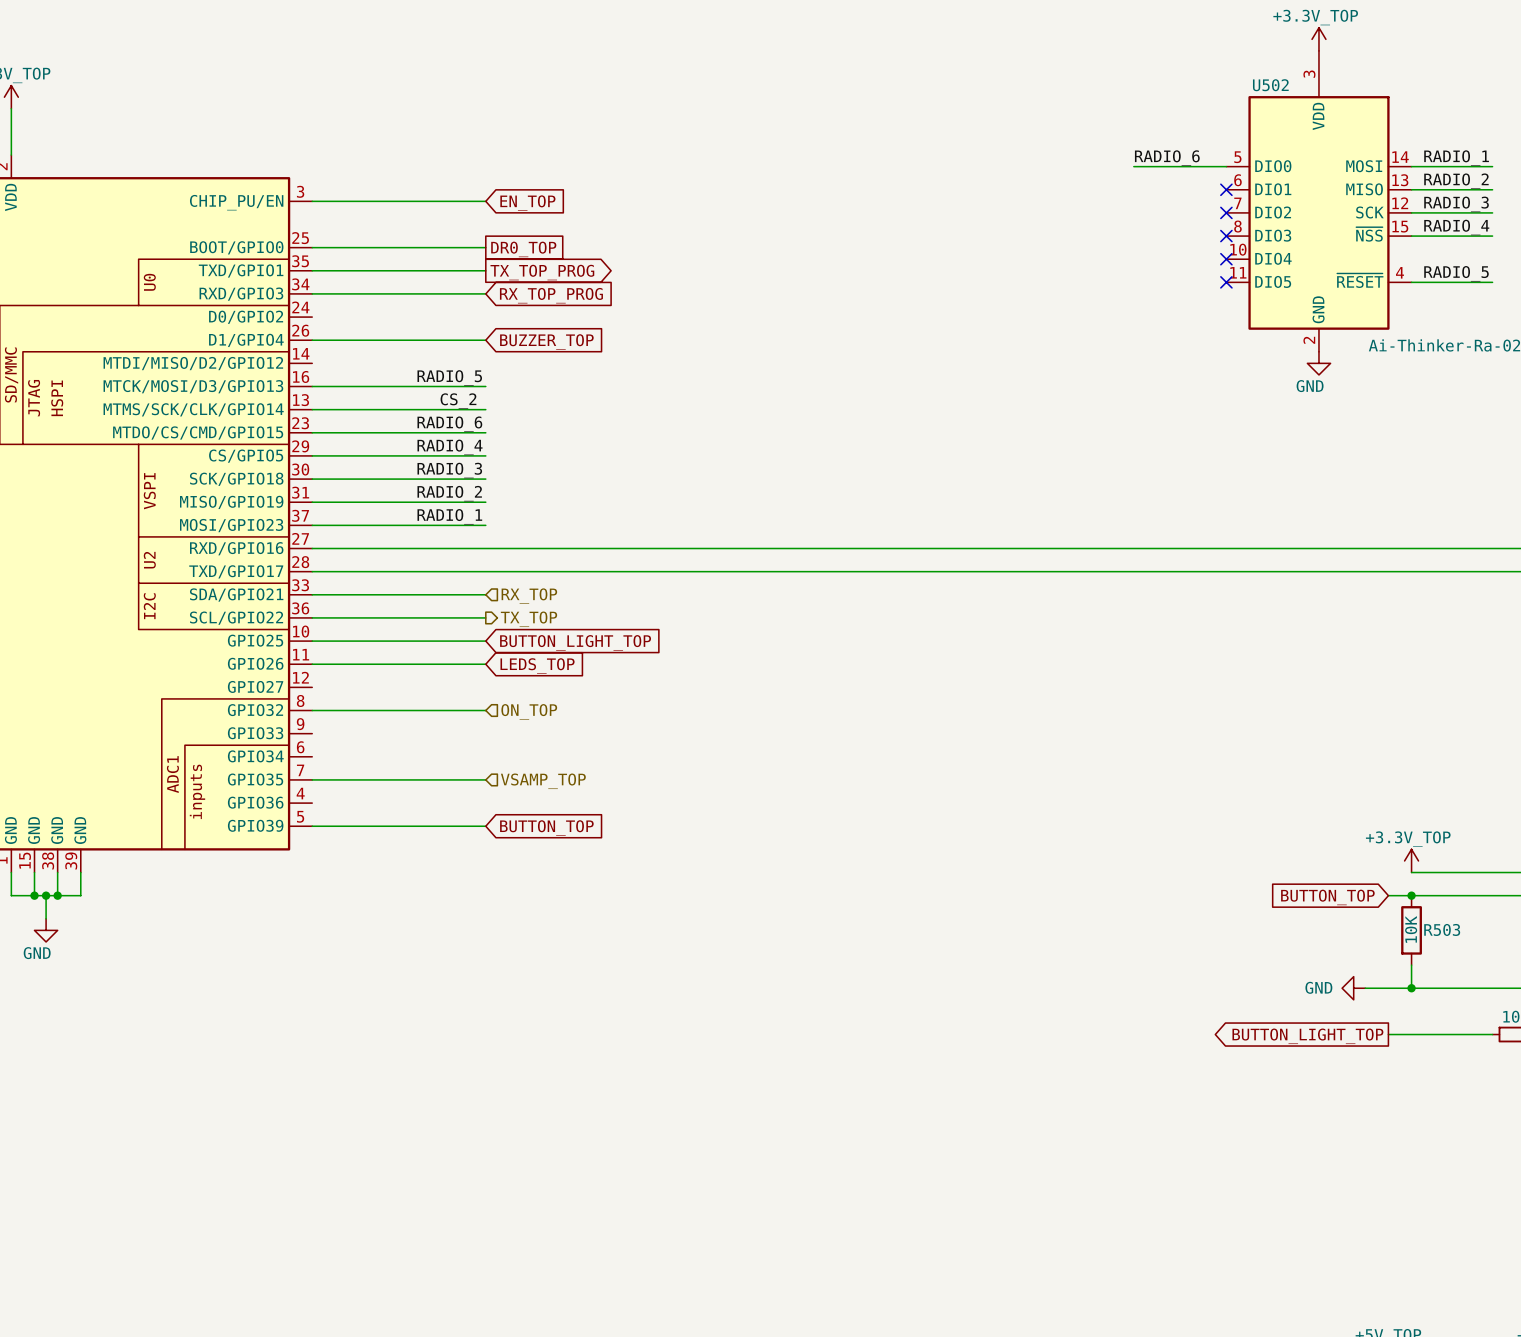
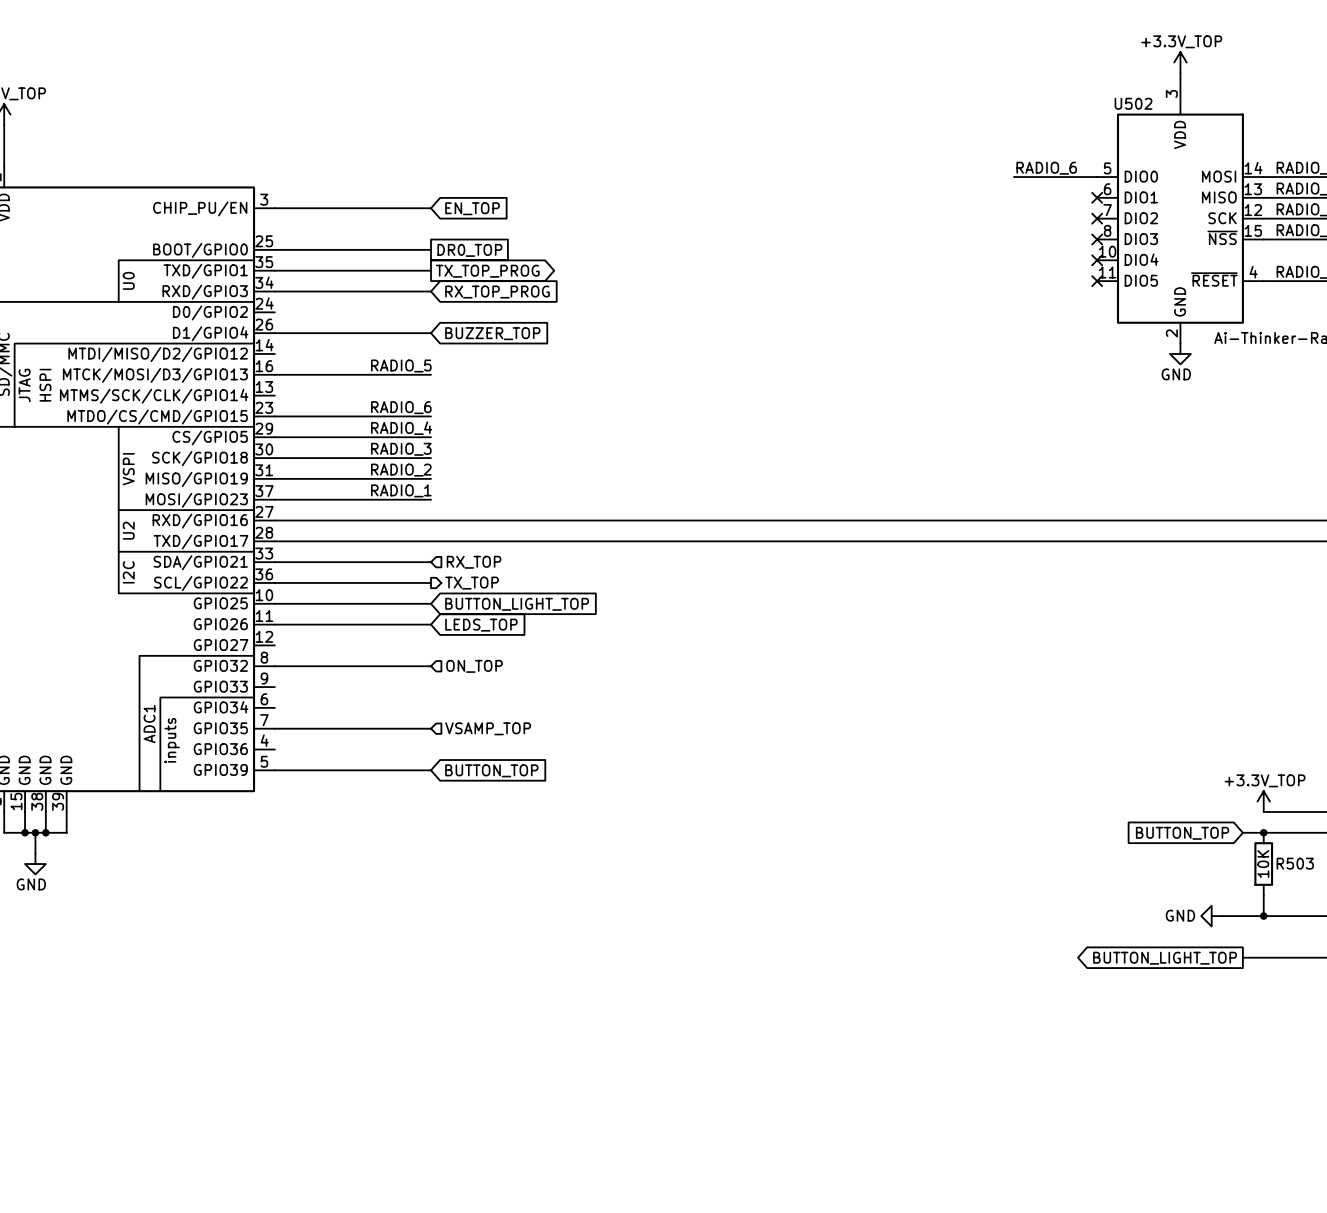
label: CS_2 (458, 401) -> none
wire: (312, 409) (485, 409) -> none

